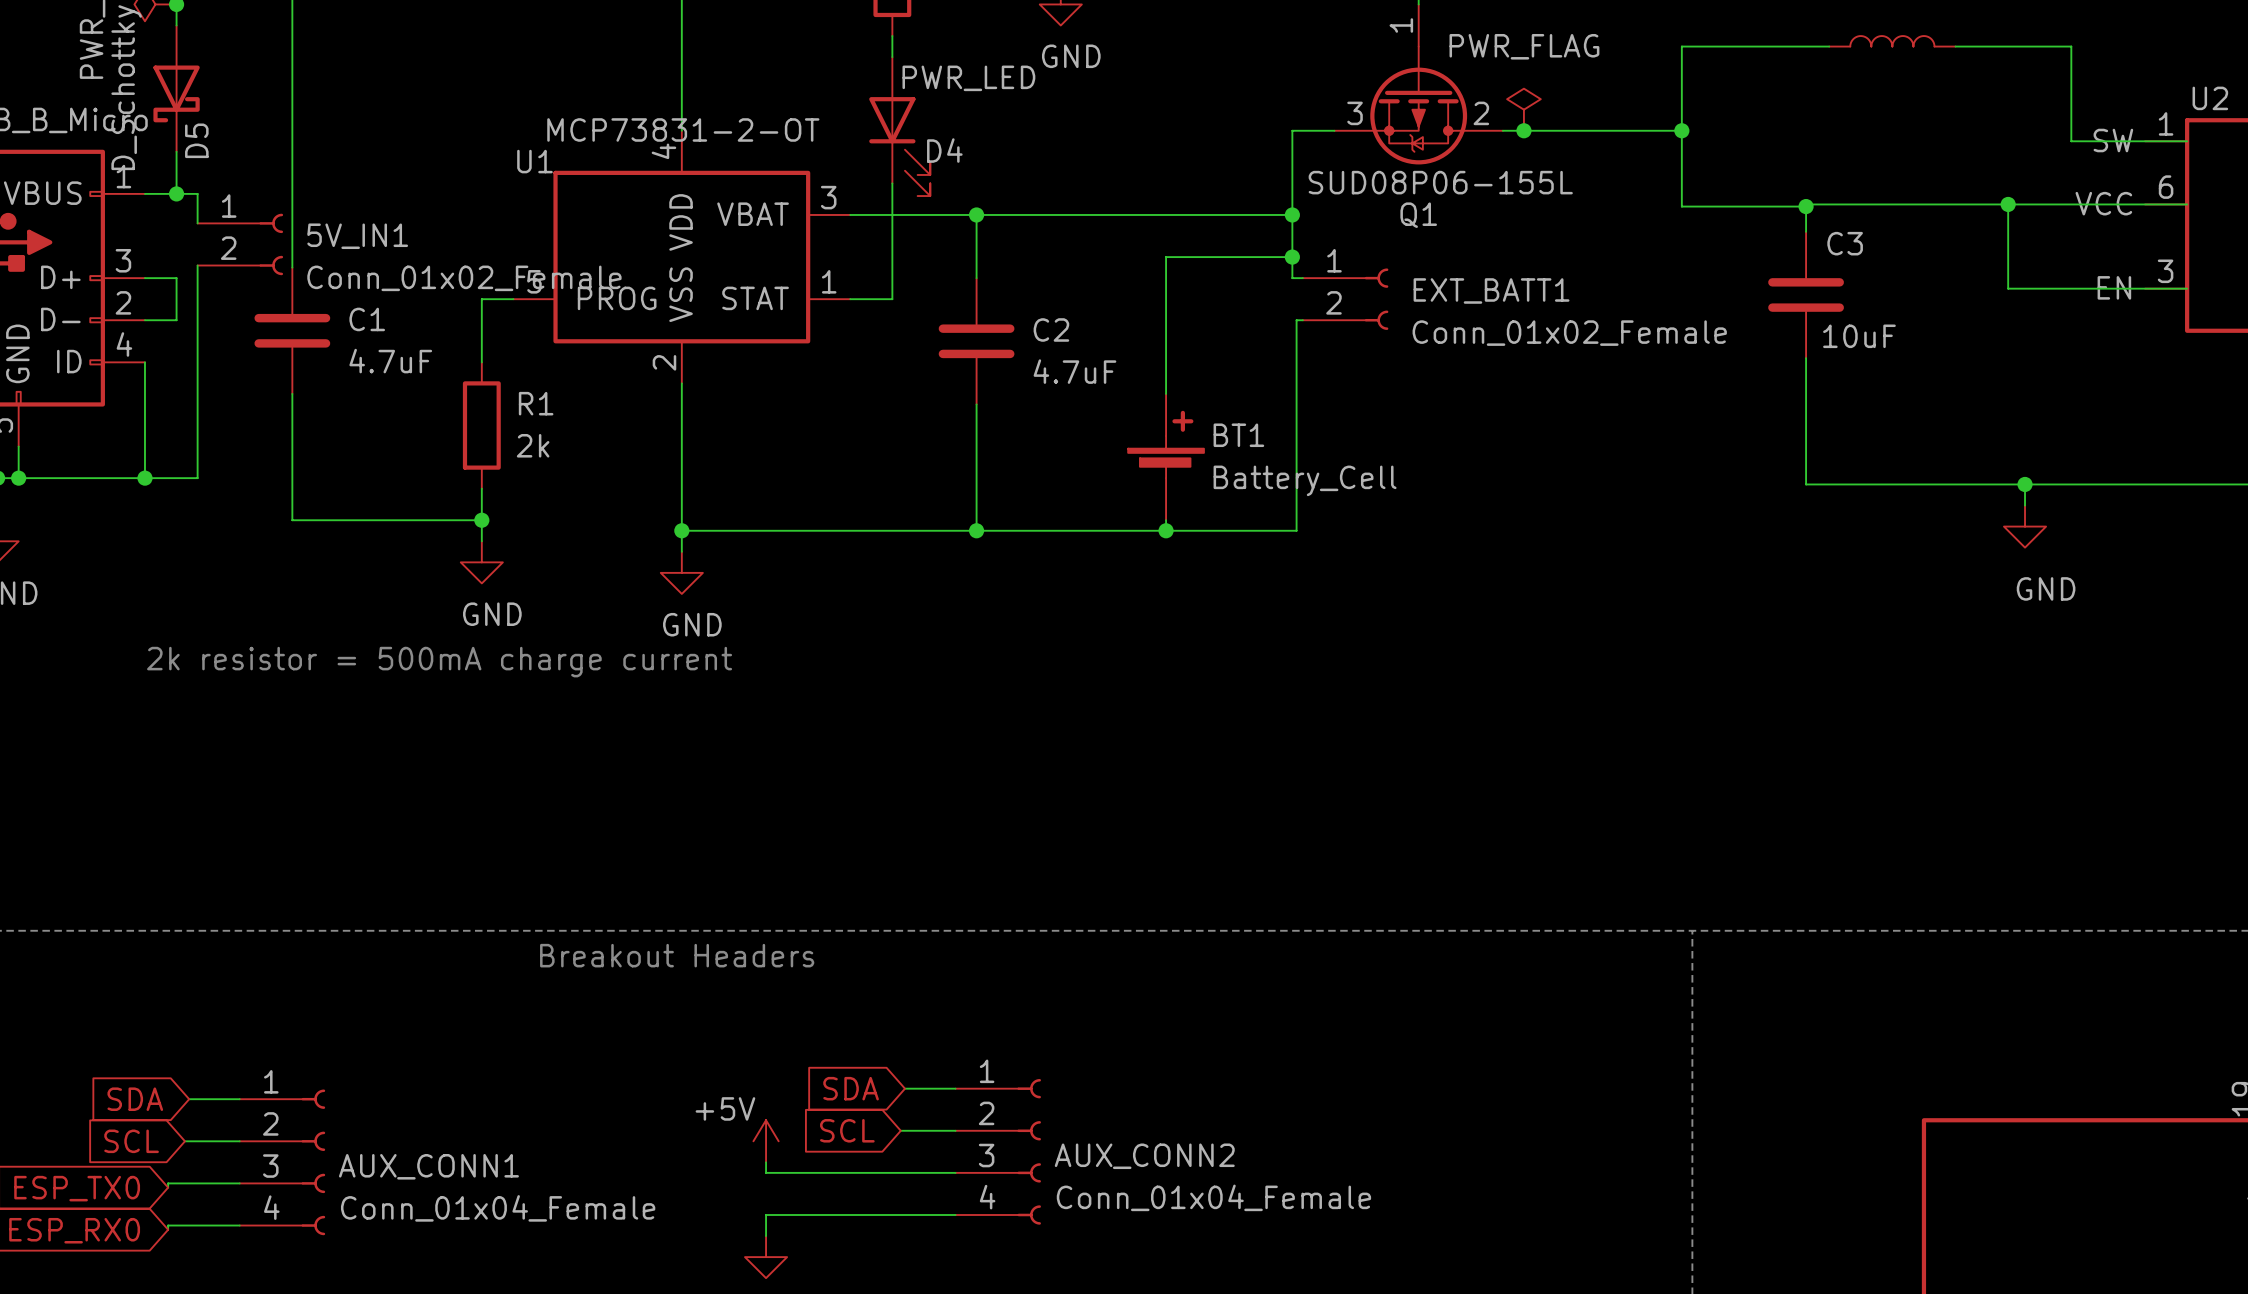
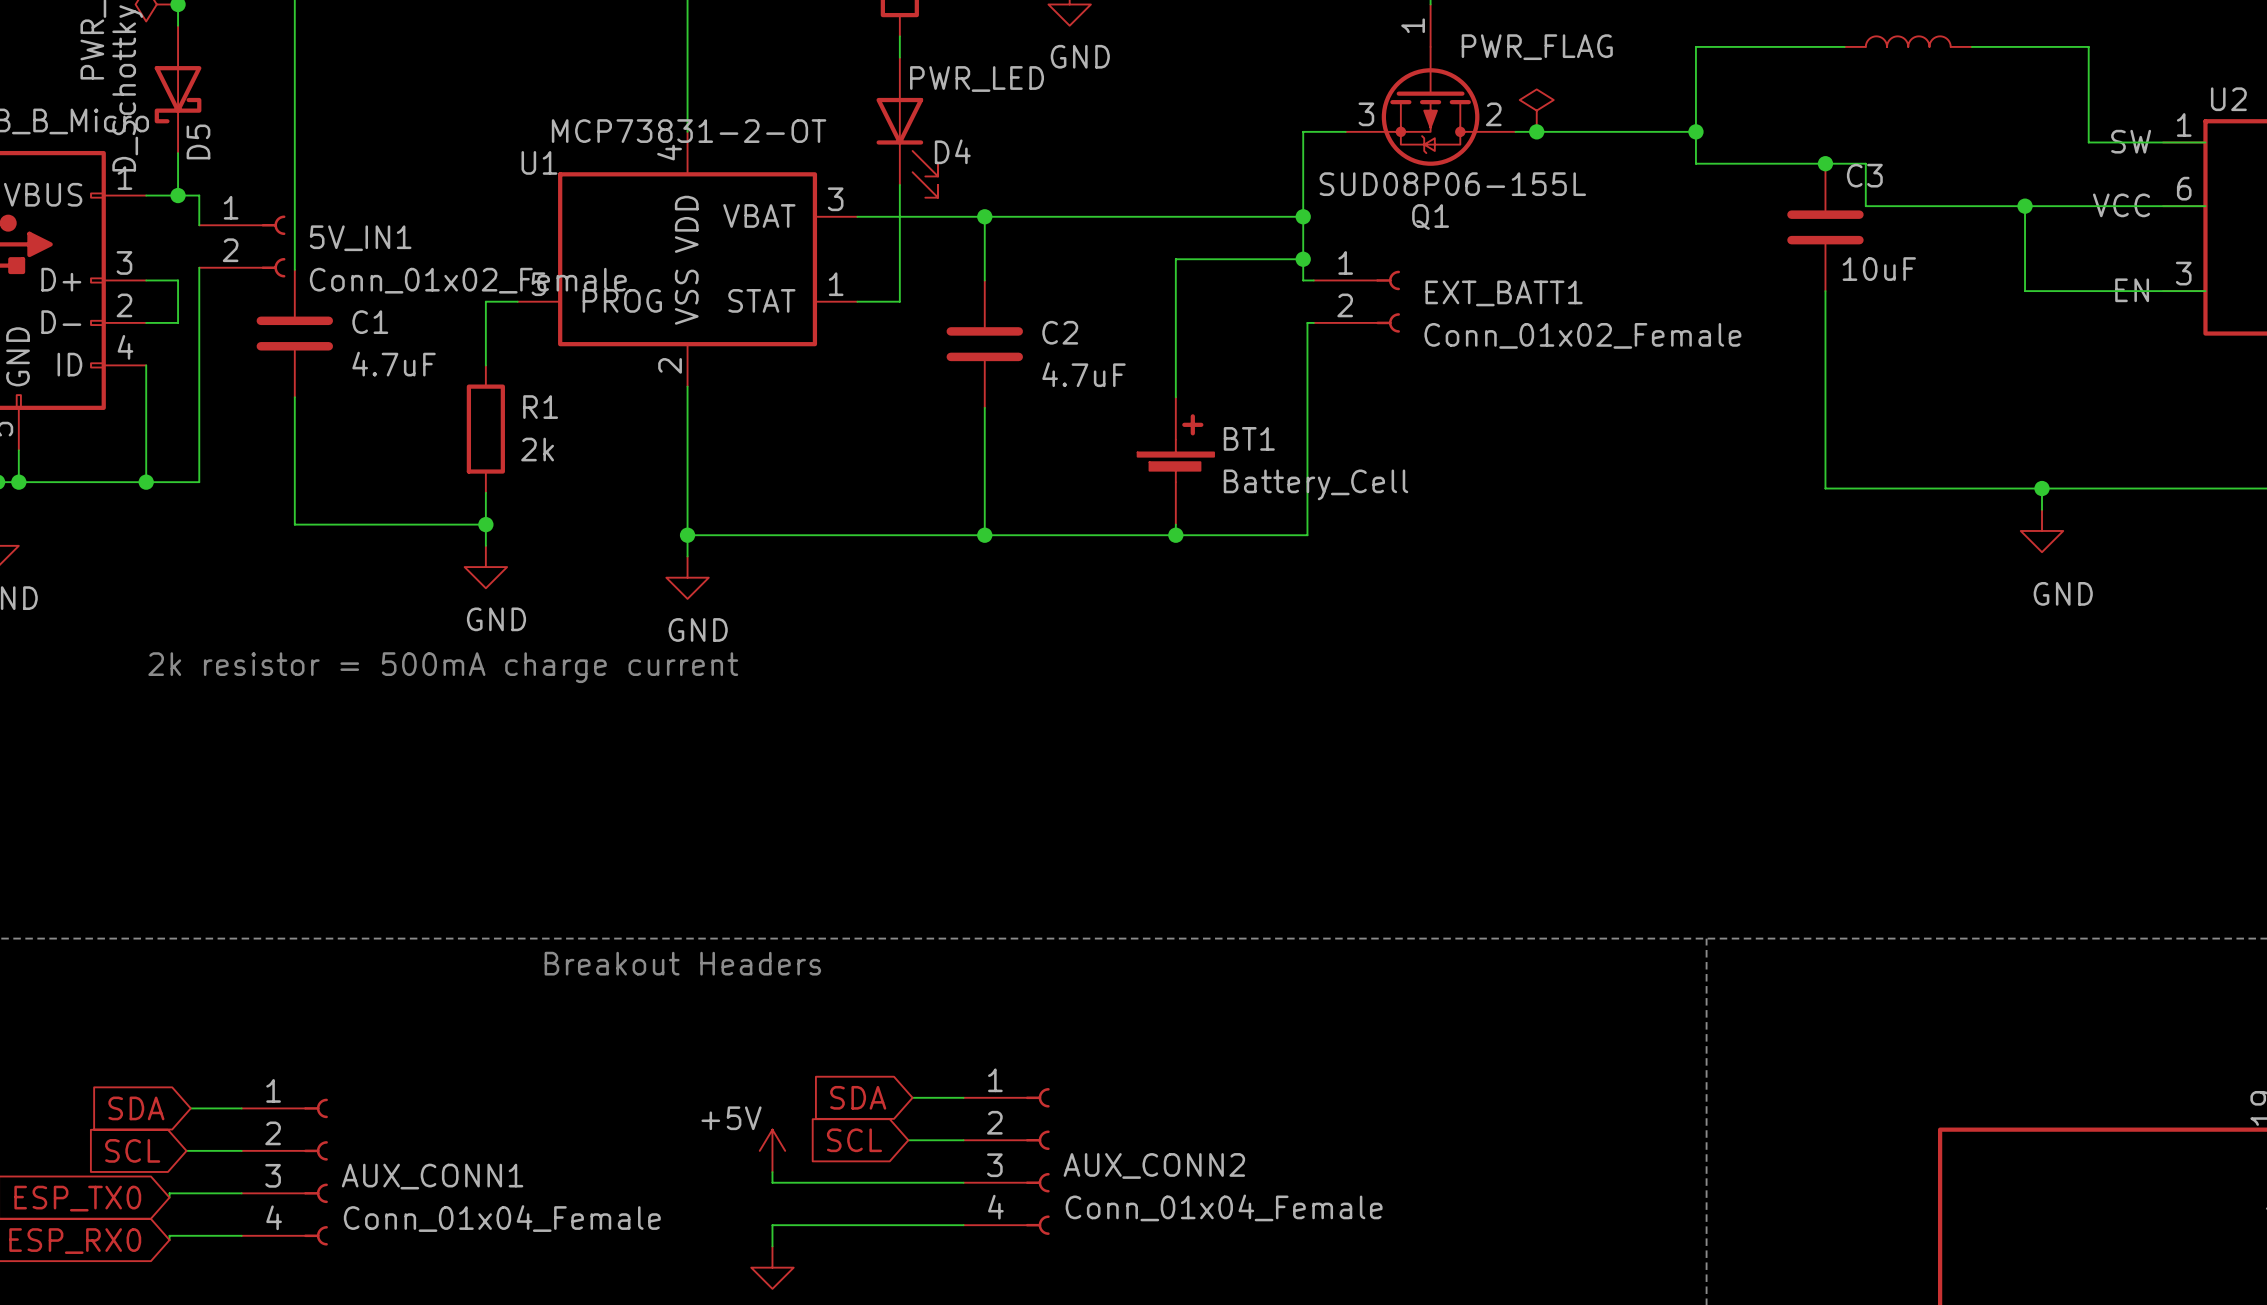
wire: (1681, 162) (1681, 206) (1806, 206) -> (1695, 163) (1865, 163) (1865, 206)
wire: (1850, 204) (1806, 204) (1806, 231) -> none
junction position: (1806, 206) -> (1825, 163)
C3 position: (1806, 294) -> (1825, 227)
wire: (1806, 358) (1806, 484) (1810, 484) -> (1825, 291) (1825, 488)

